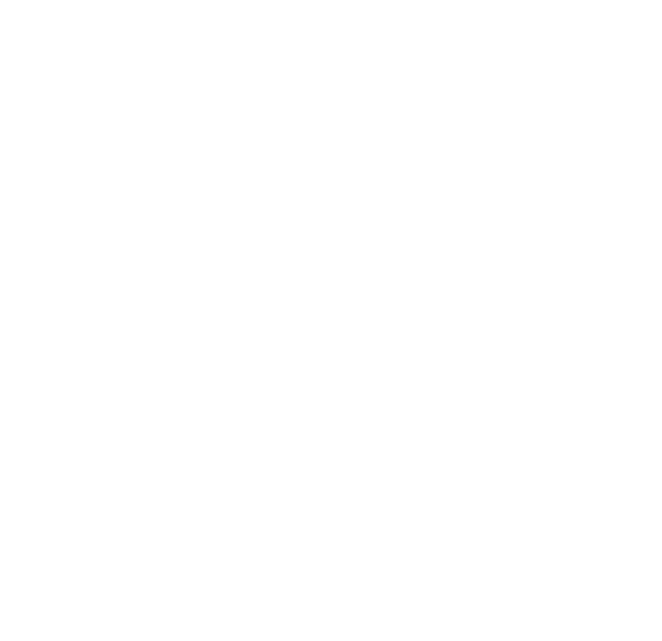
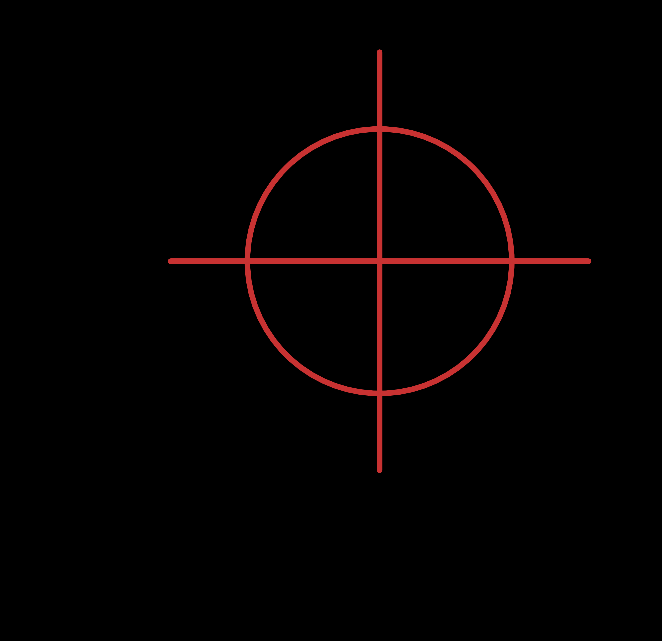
track: none -> (379, 52) (379, 470)
drawing: none -> [244, 126, 515, 396]
track: none -> (170, 261) (588, 261)

